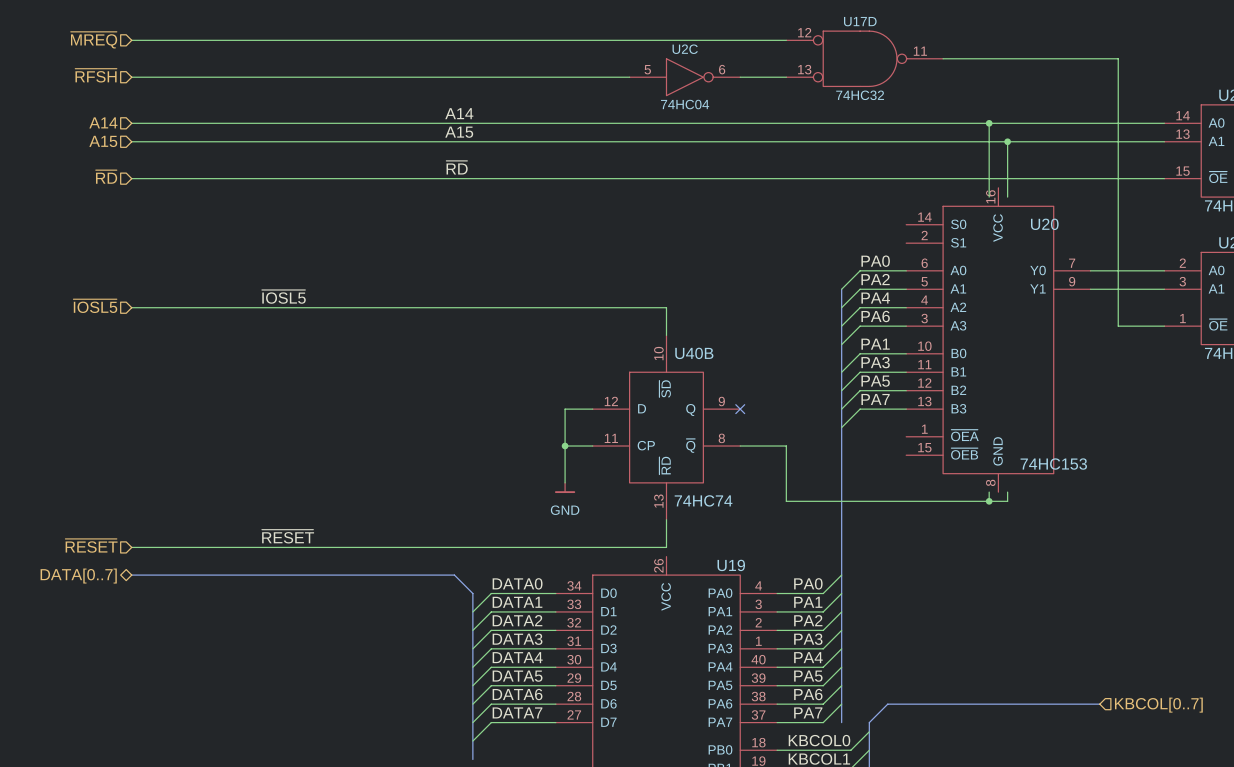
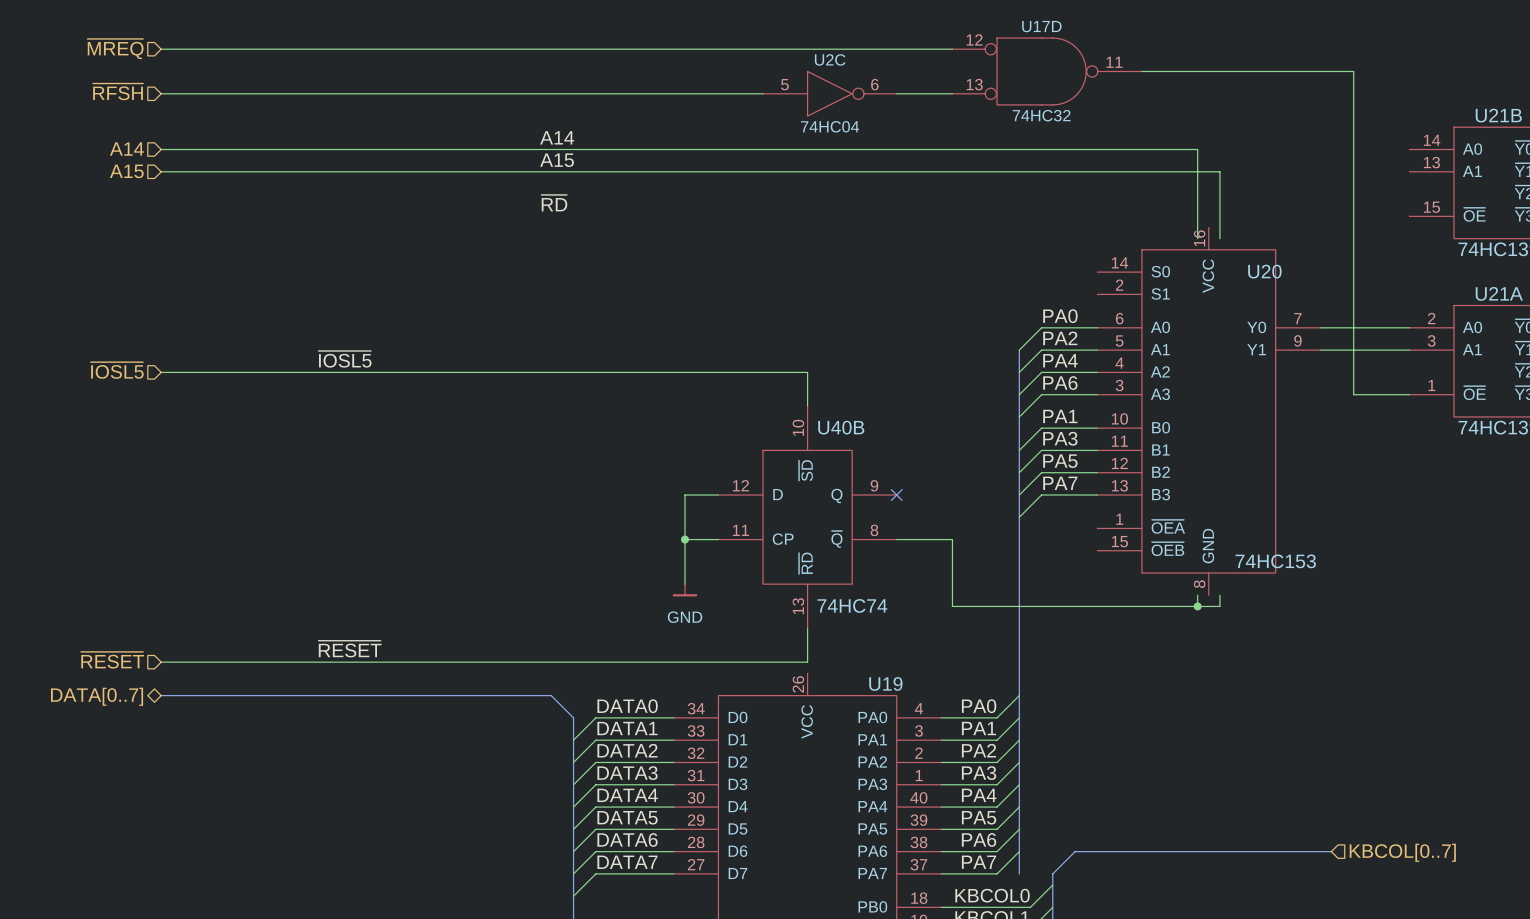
wire: (989, 123) (1164, 123) -> none
junction: (989, 123) -> none
wire: (1007, 141) (1164, 141) -> none
junction: (1007, 141) -> none
hierarchical label: ~{RD} (106, 176) -> none
wire: (131, 178) (1164, 178) -> none

